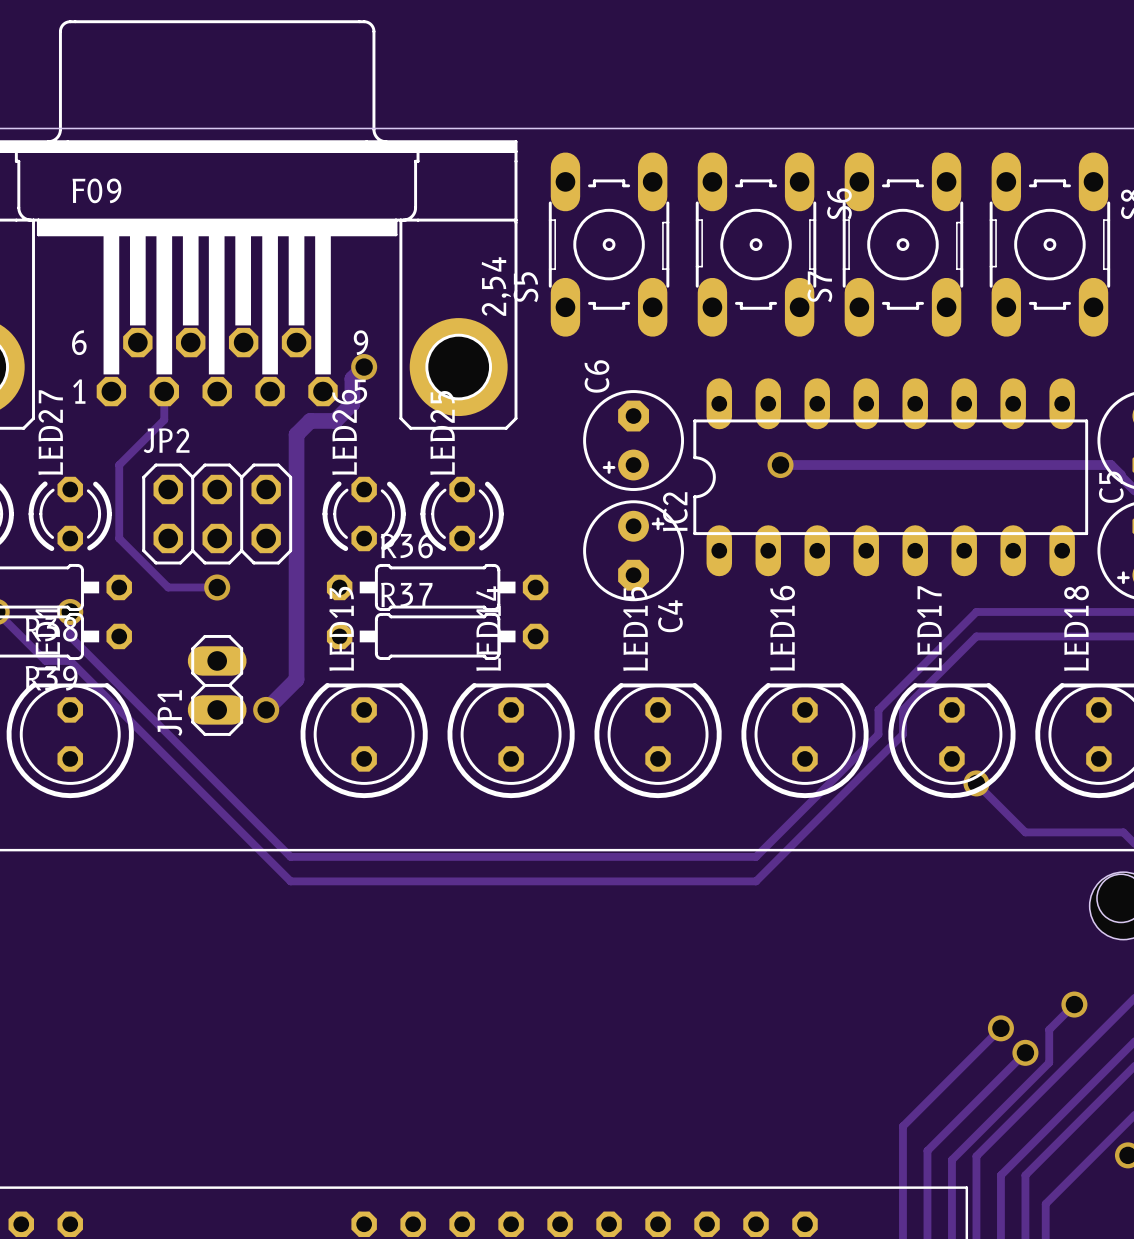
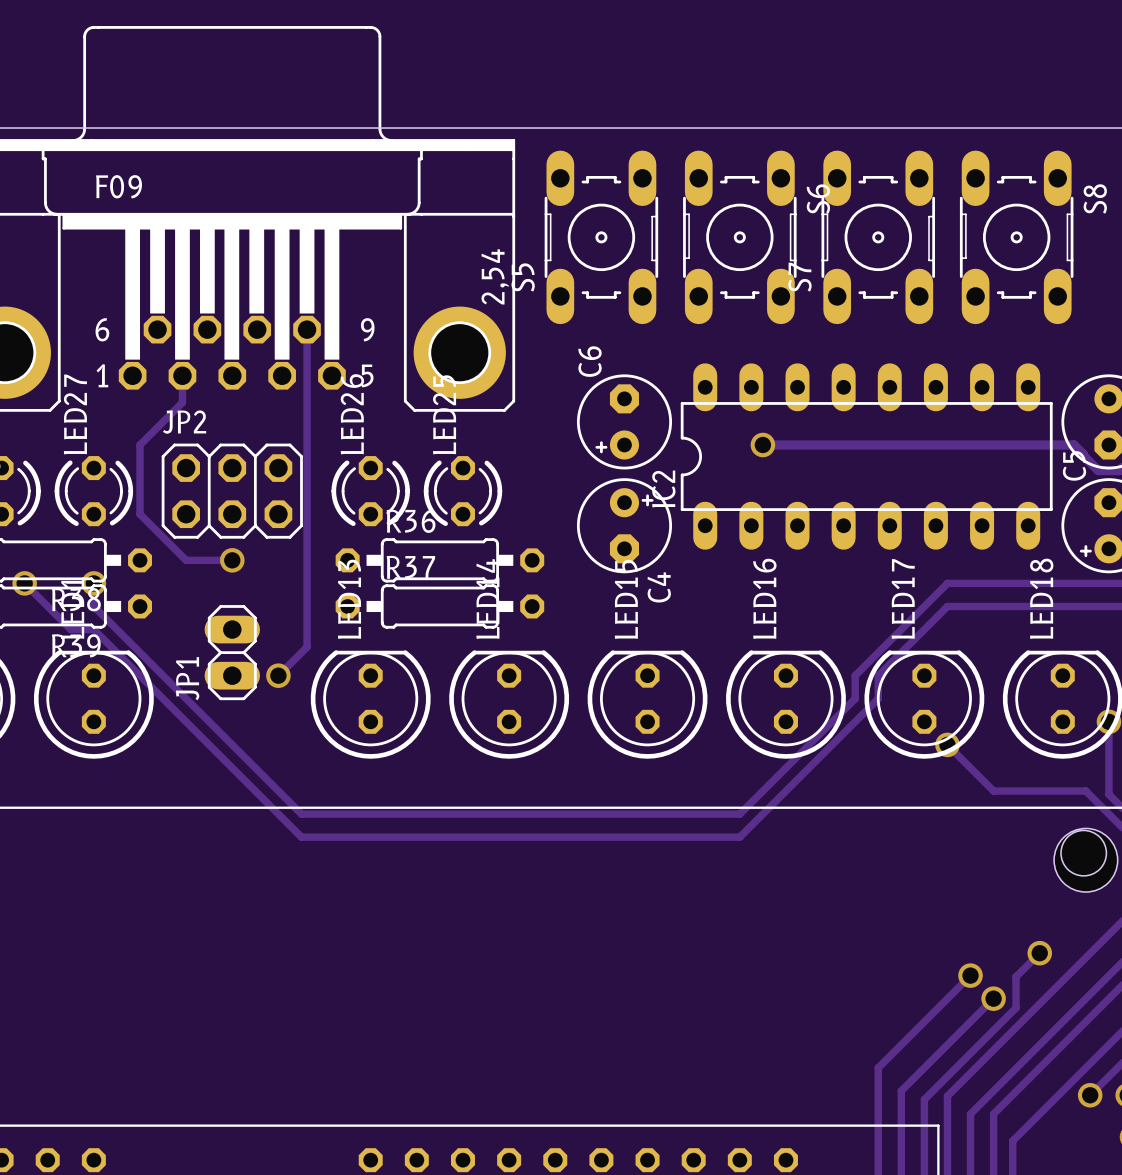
track: (364, 367) (352, 378) (352, 403) (335, 420) (310, 420) (296, 434) -> (307, 329) (307, 416)
via: (364, 367) -> none
track width: thick (296, 434) (296, 679) (266, 709) -> thin (307, 416) (307, 647) (278, 675)

